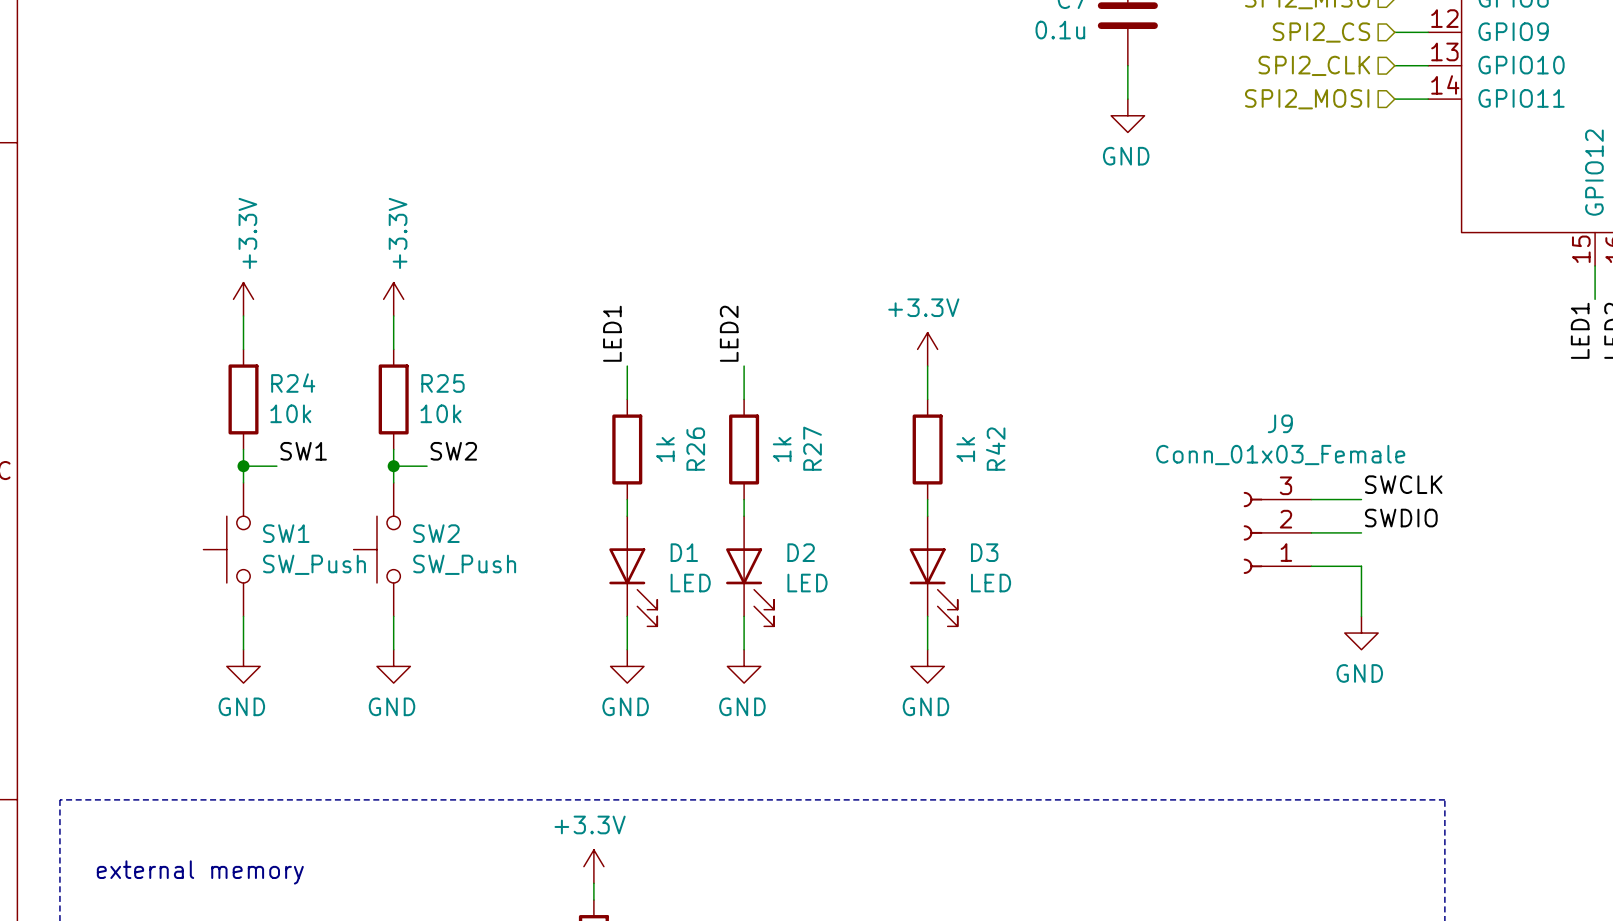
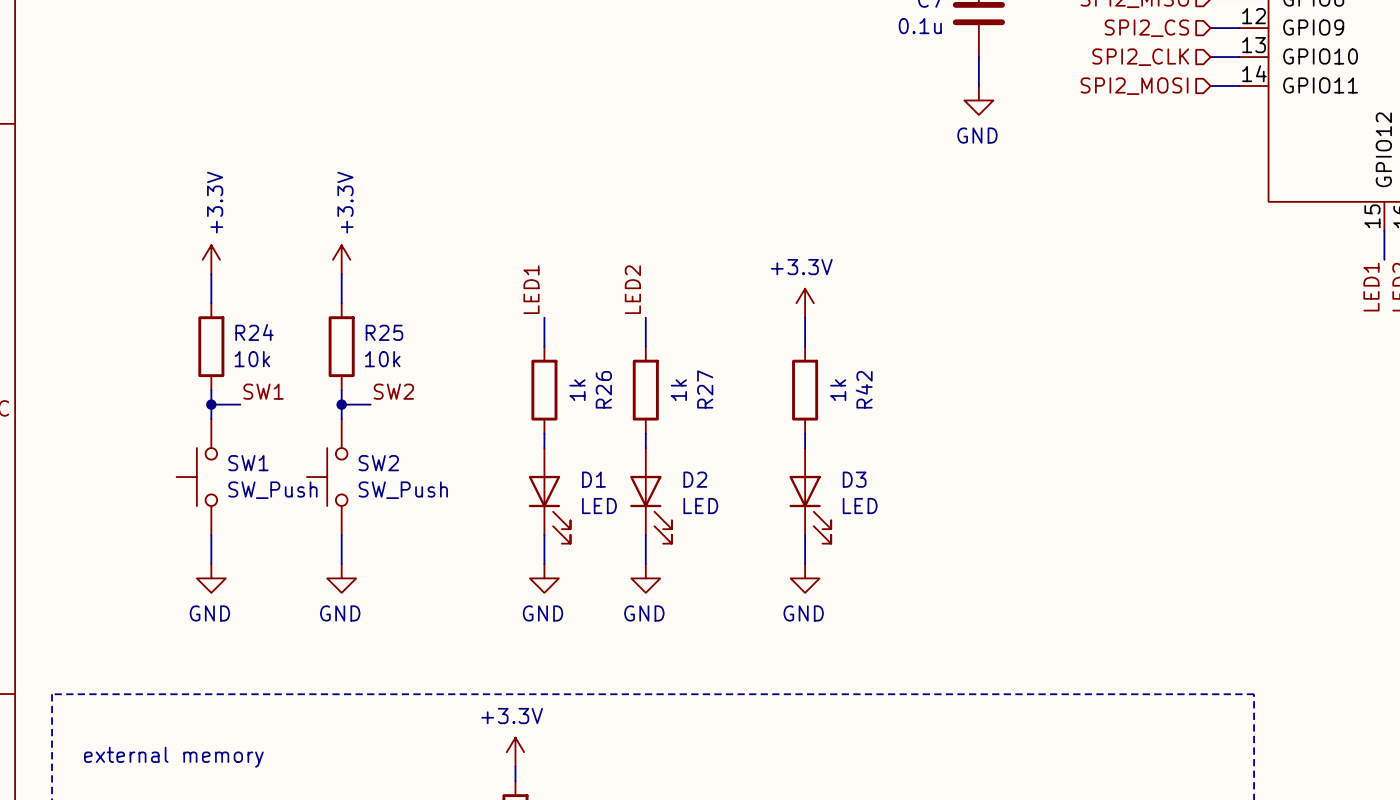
label: SWCLK (1403, 484) -> none
wire: (1311, 499) (1361, 499) -> none
label: SWDIO (1401, 518) -> none
J9: Conn_01x03_Female (1277, 532) -> none
wire: (1311, 532) (1361, 532) -> none
wire: (1311, 566) (1361, 566) (1361, 616) -> none
power symbol: GND (1361, 633) -> none

